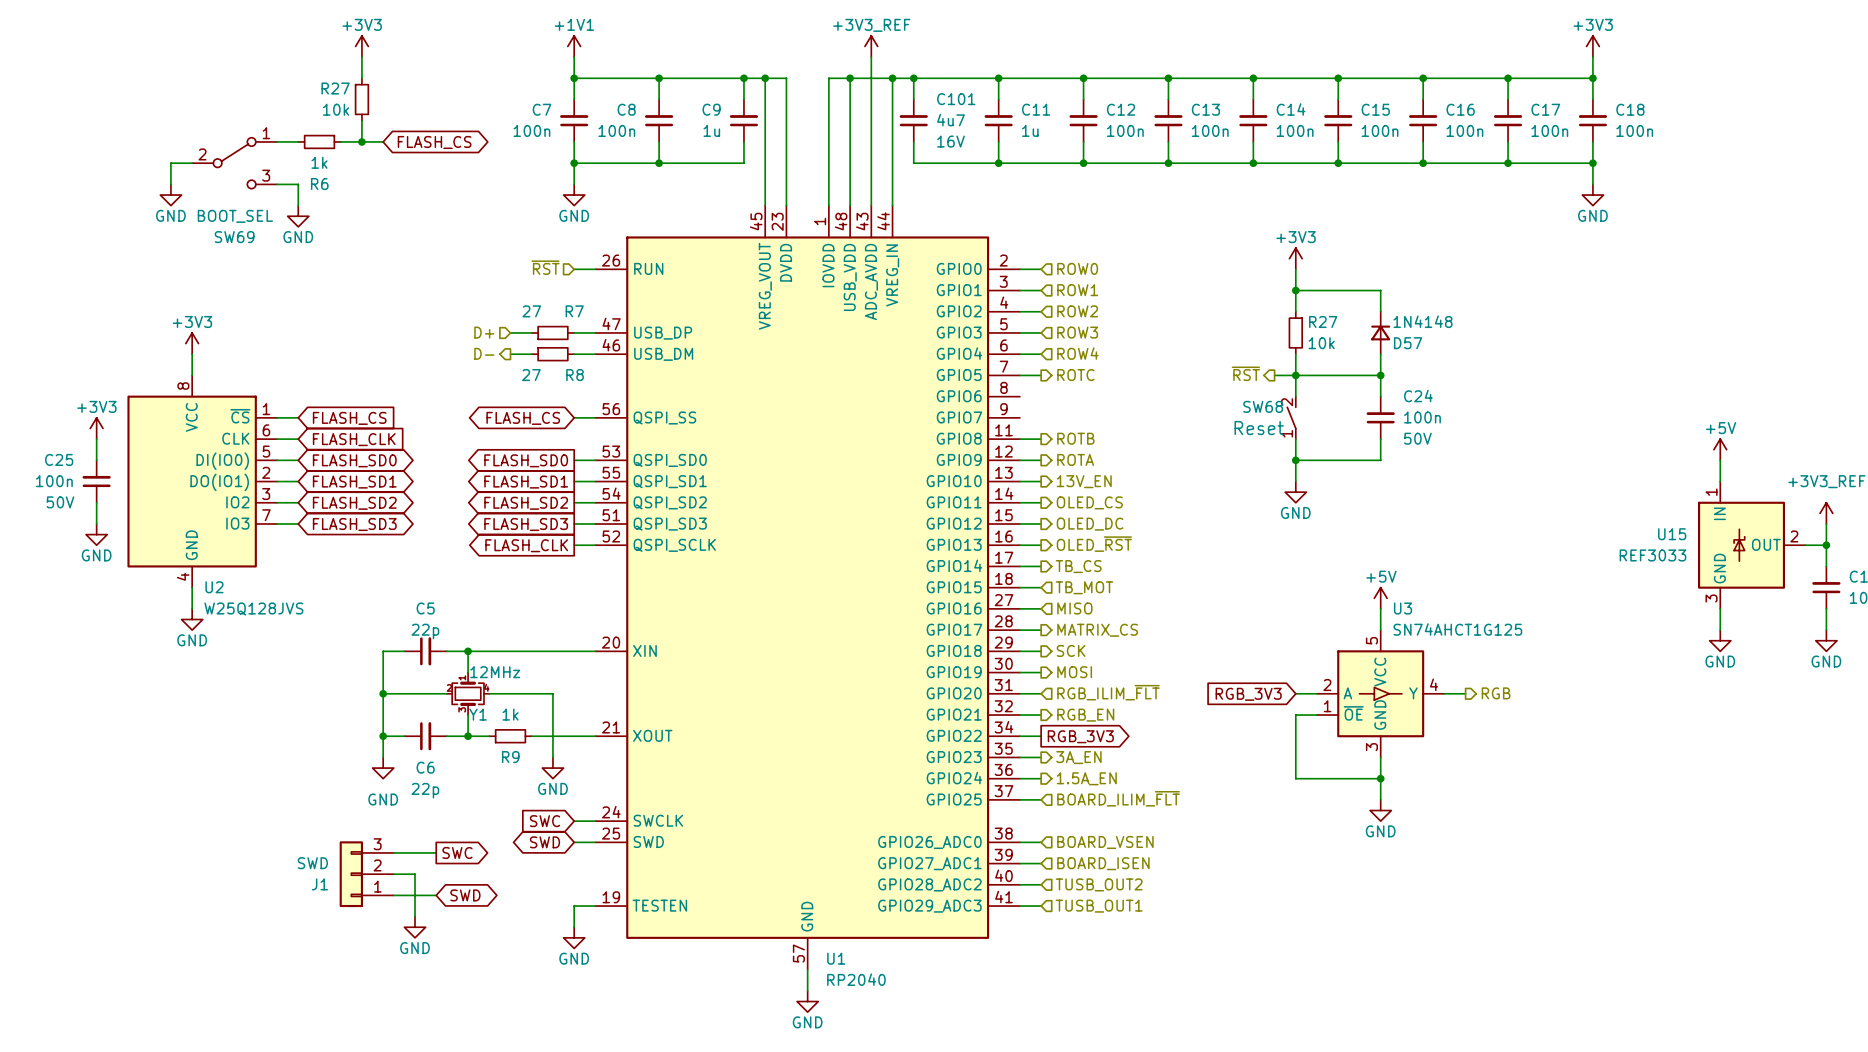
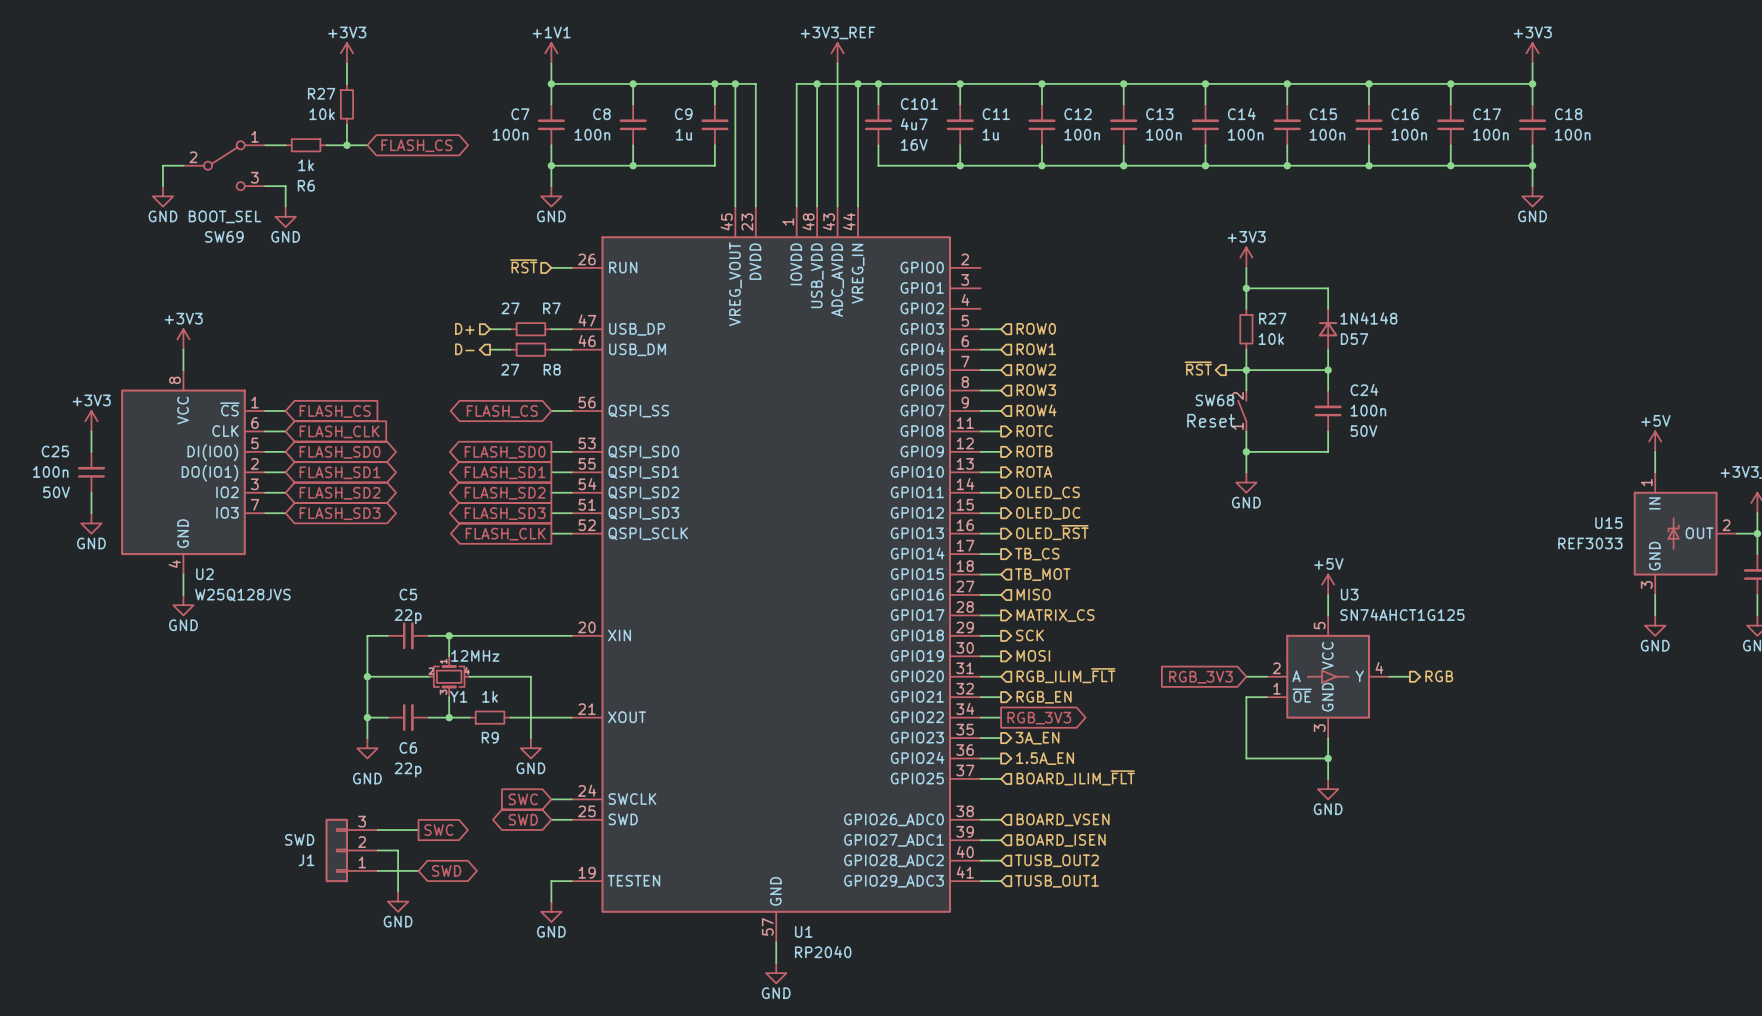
hierarchical label: ROW0 (1077, 268) -> none
wire: (1019, 269) (1041, 269) -> none
wire: (1019, 290) (1041, 290) -> (980, 390) (1001, 390)
hierarchical label: ROW1 (1077, 290) -> none
wire: (1019, 311) (1041, 311) -> (980, 411) (1001, 411)
hierarchical label: ROW2 (1077, 311) -> none
hierarchical label: ROW3 (1077, 332) -> ROW0 (1036, 328)
hierarchical label: ROW4 (1077, 353) -> ROW1 (1036, 349)
hierarchical label shape: output (1075, 375) -> input (1036, 369)
hierarchical label: ROTC (1075, 375) -> ROW2 (1036, 369)
hierarchical label: none -> ROW3 (1036, 390)
hierarchical label: none -> ROW4 (1036, 410)
hierarchical label: ROTB (1075, 438) -> ROTC (1034, 431)
hierarchical label: ROTA (1075, 459) -> ROTB (1034, 451)
hierarchical label: 13V_EN (1084, 481) -> ROTA (1034, 471)

